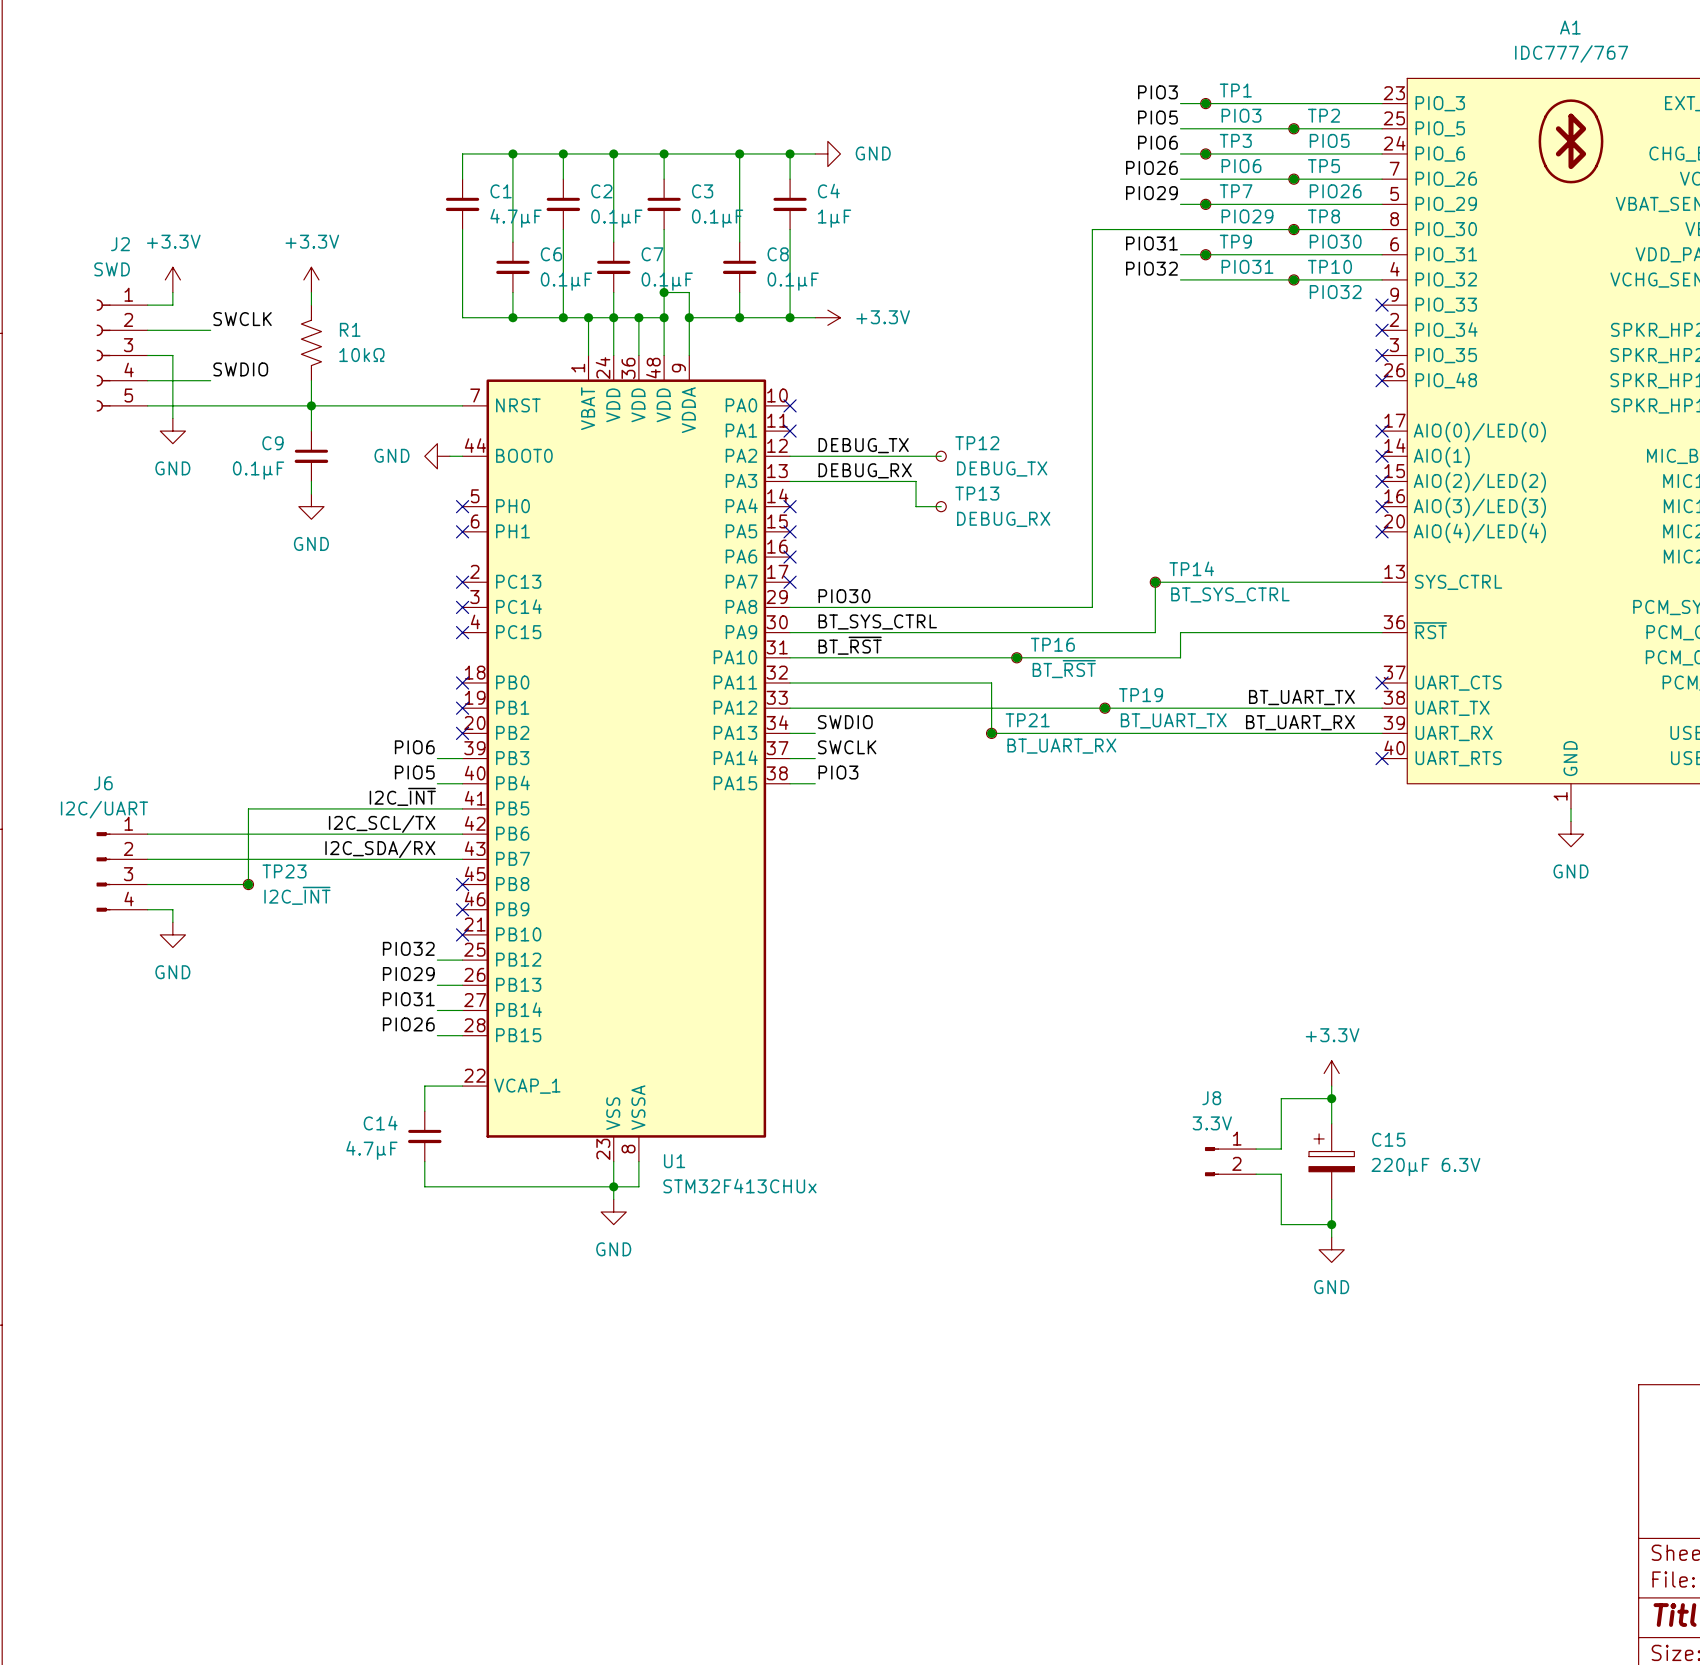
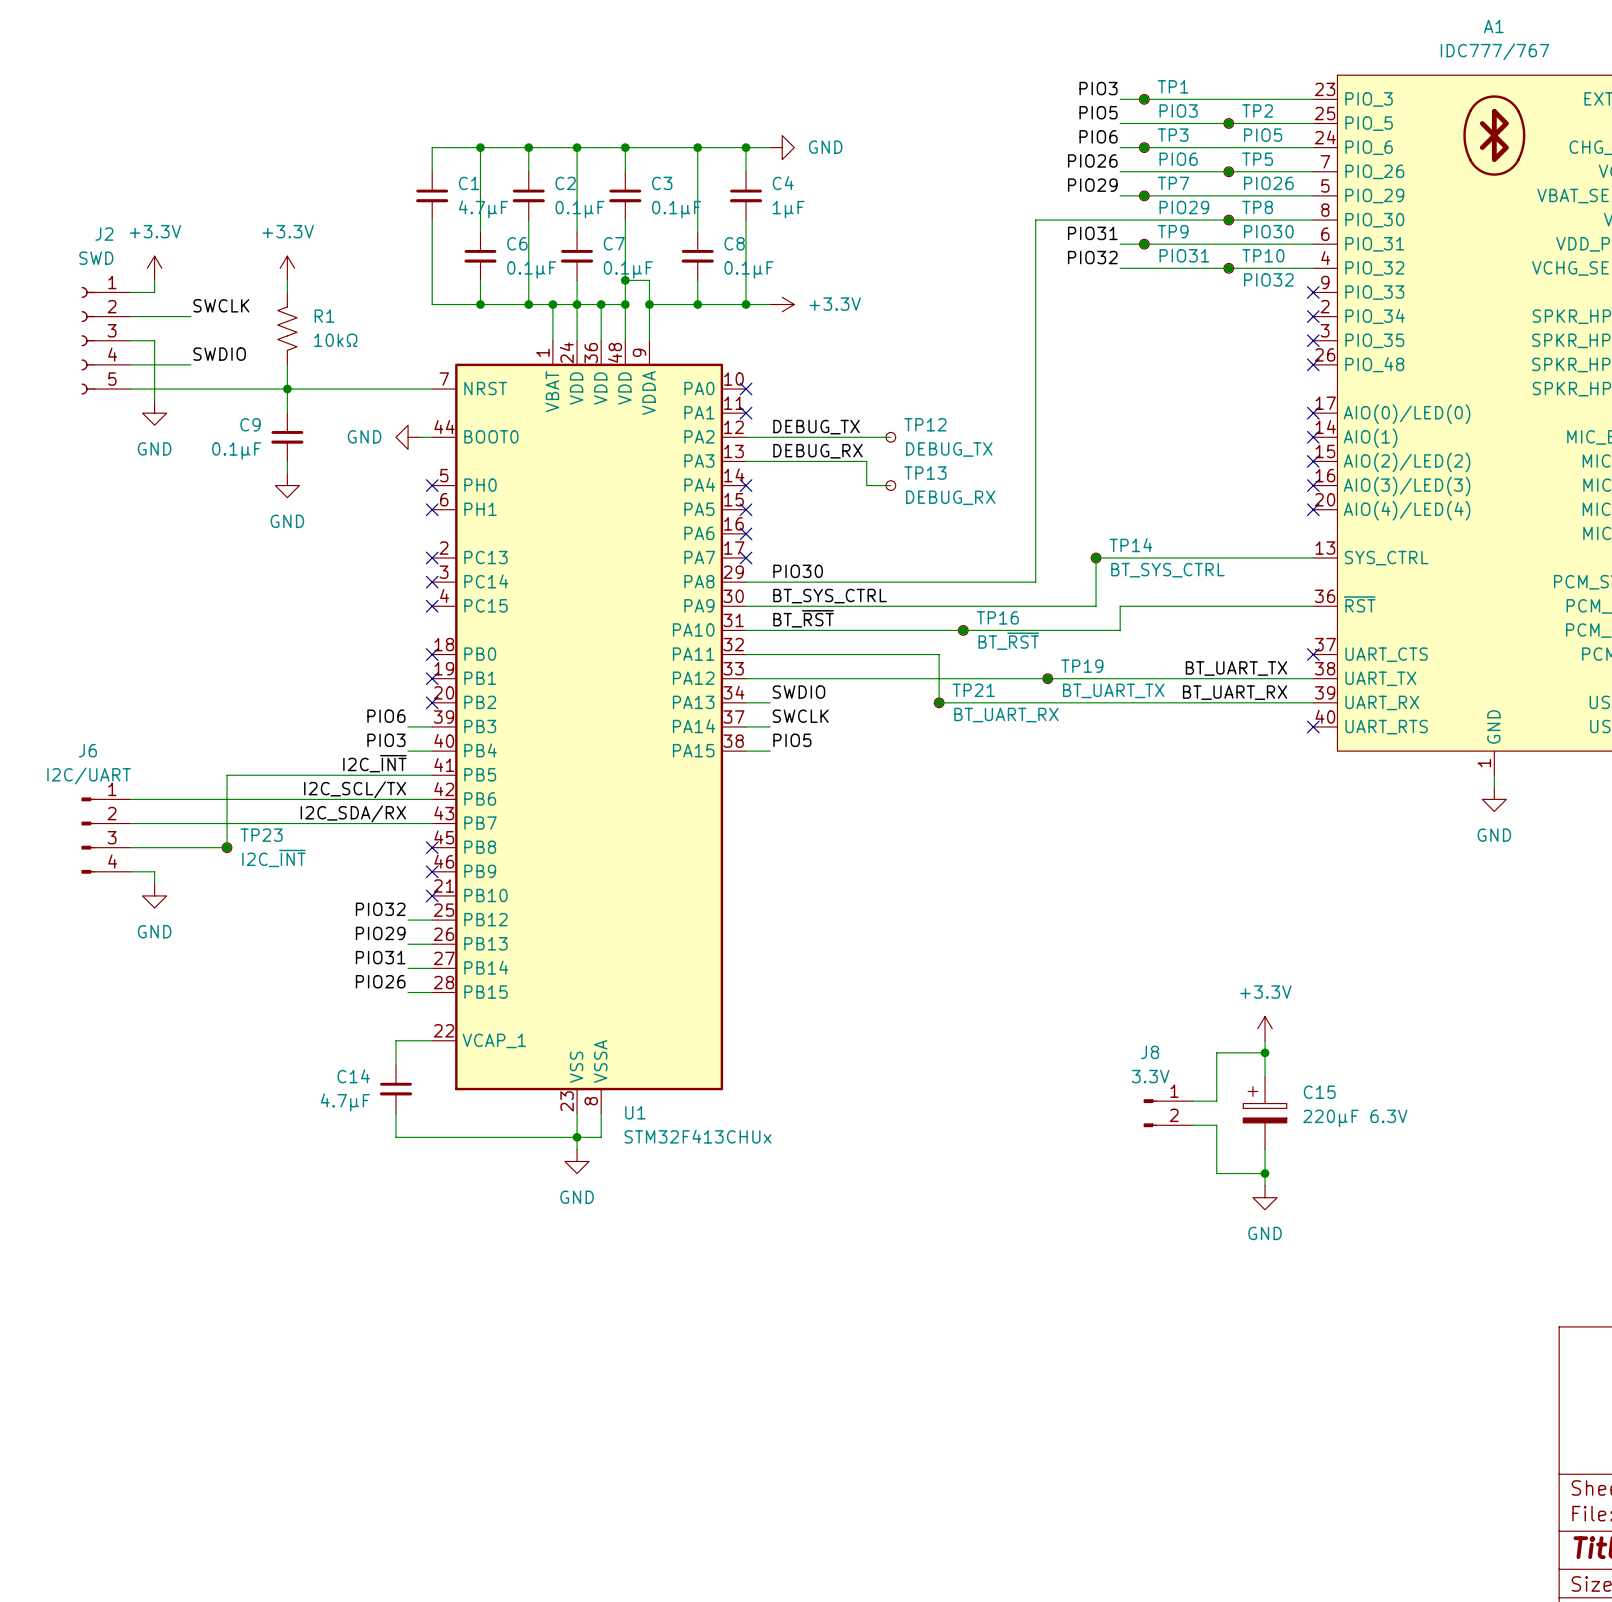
label: PIO5 (414, 772) -> PIO3 (386, 740)
label: PIO3 (838, 772) -> PIO5 (792, 740)

